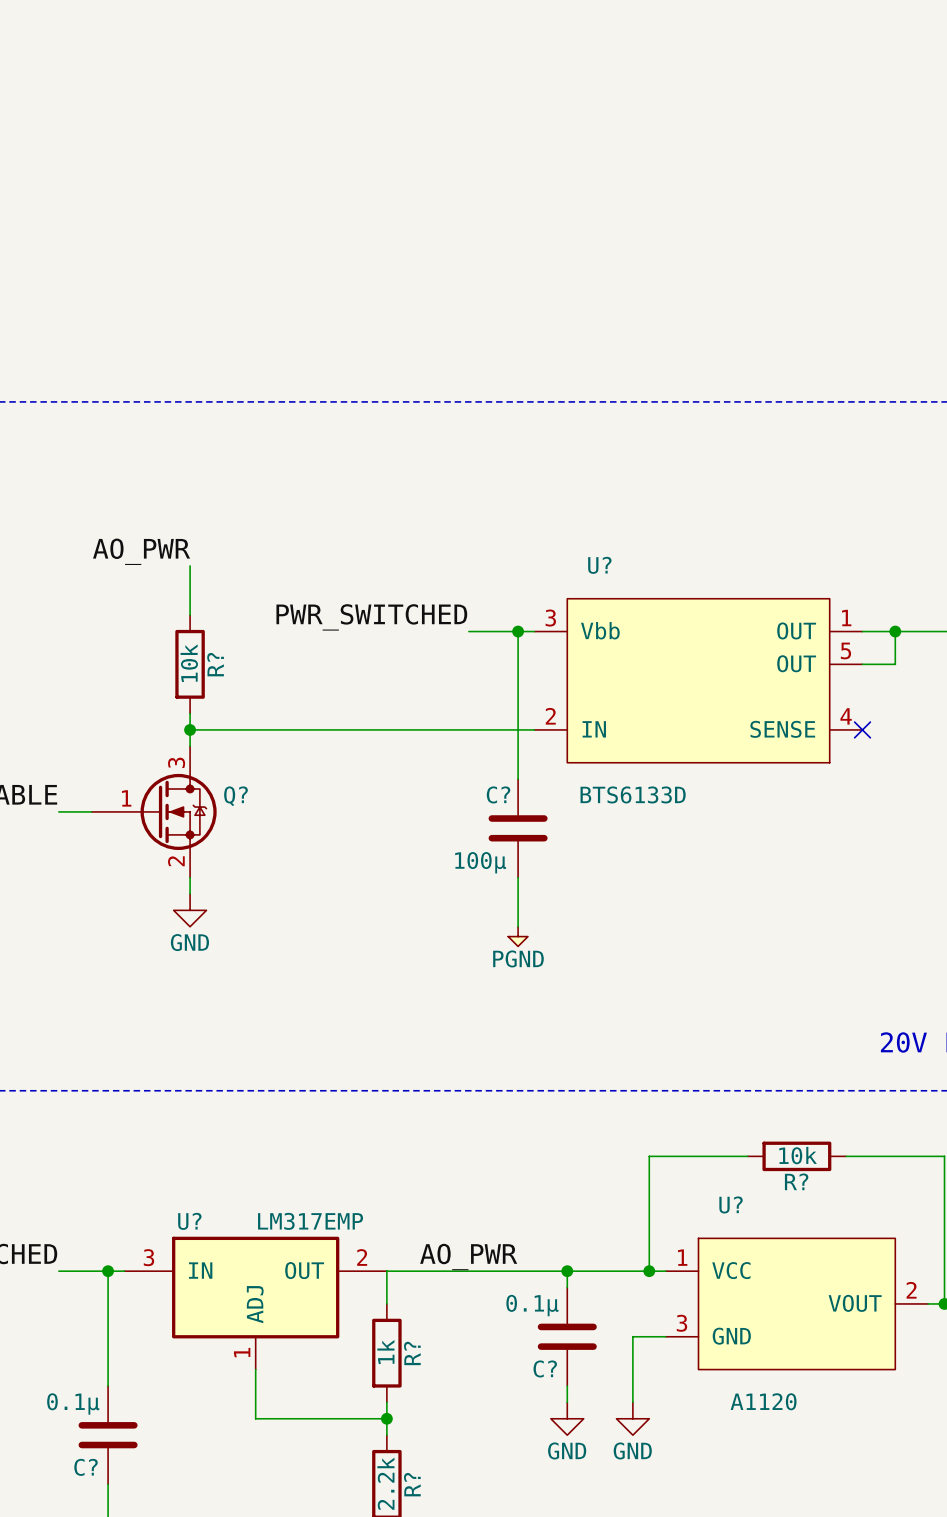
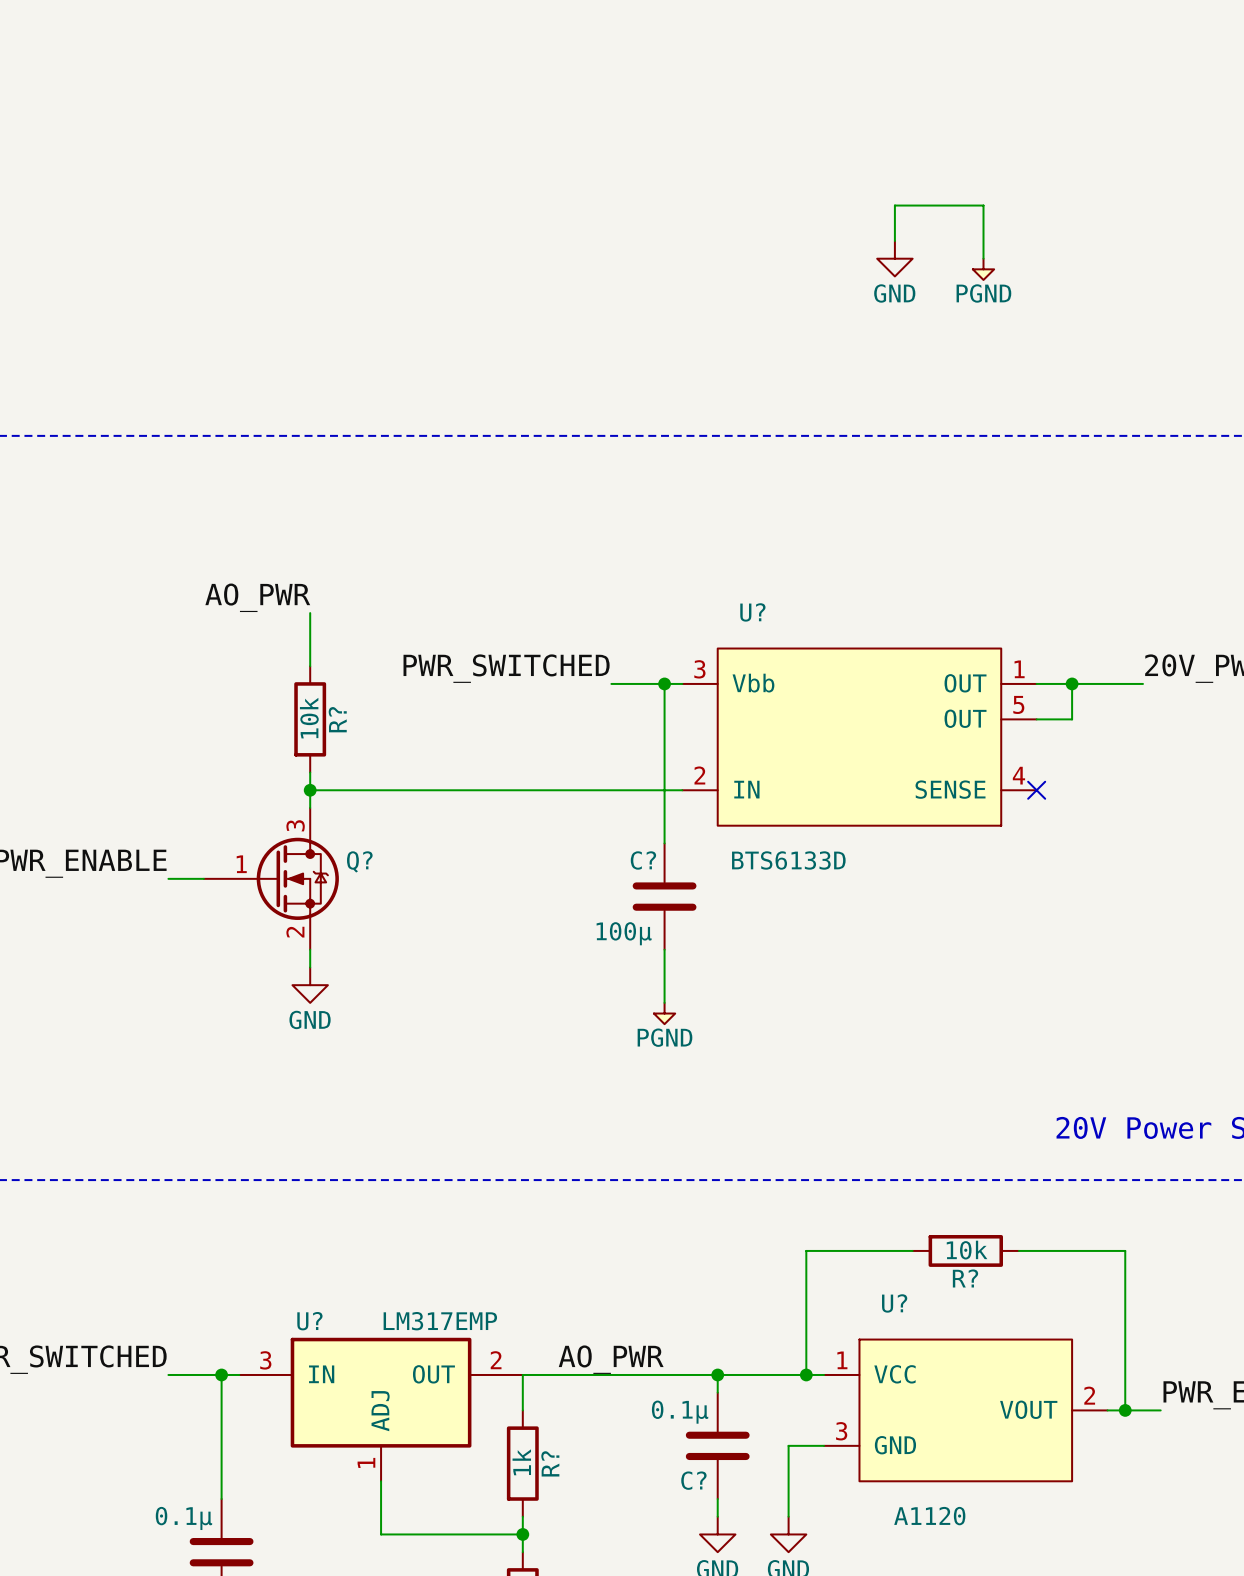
wire: none -> (894, 240) (894, 205) (983, 205) (983, 258)
power symbol: none -> GND (894, 258)
power symbol: none -> PGND (983, 269)

